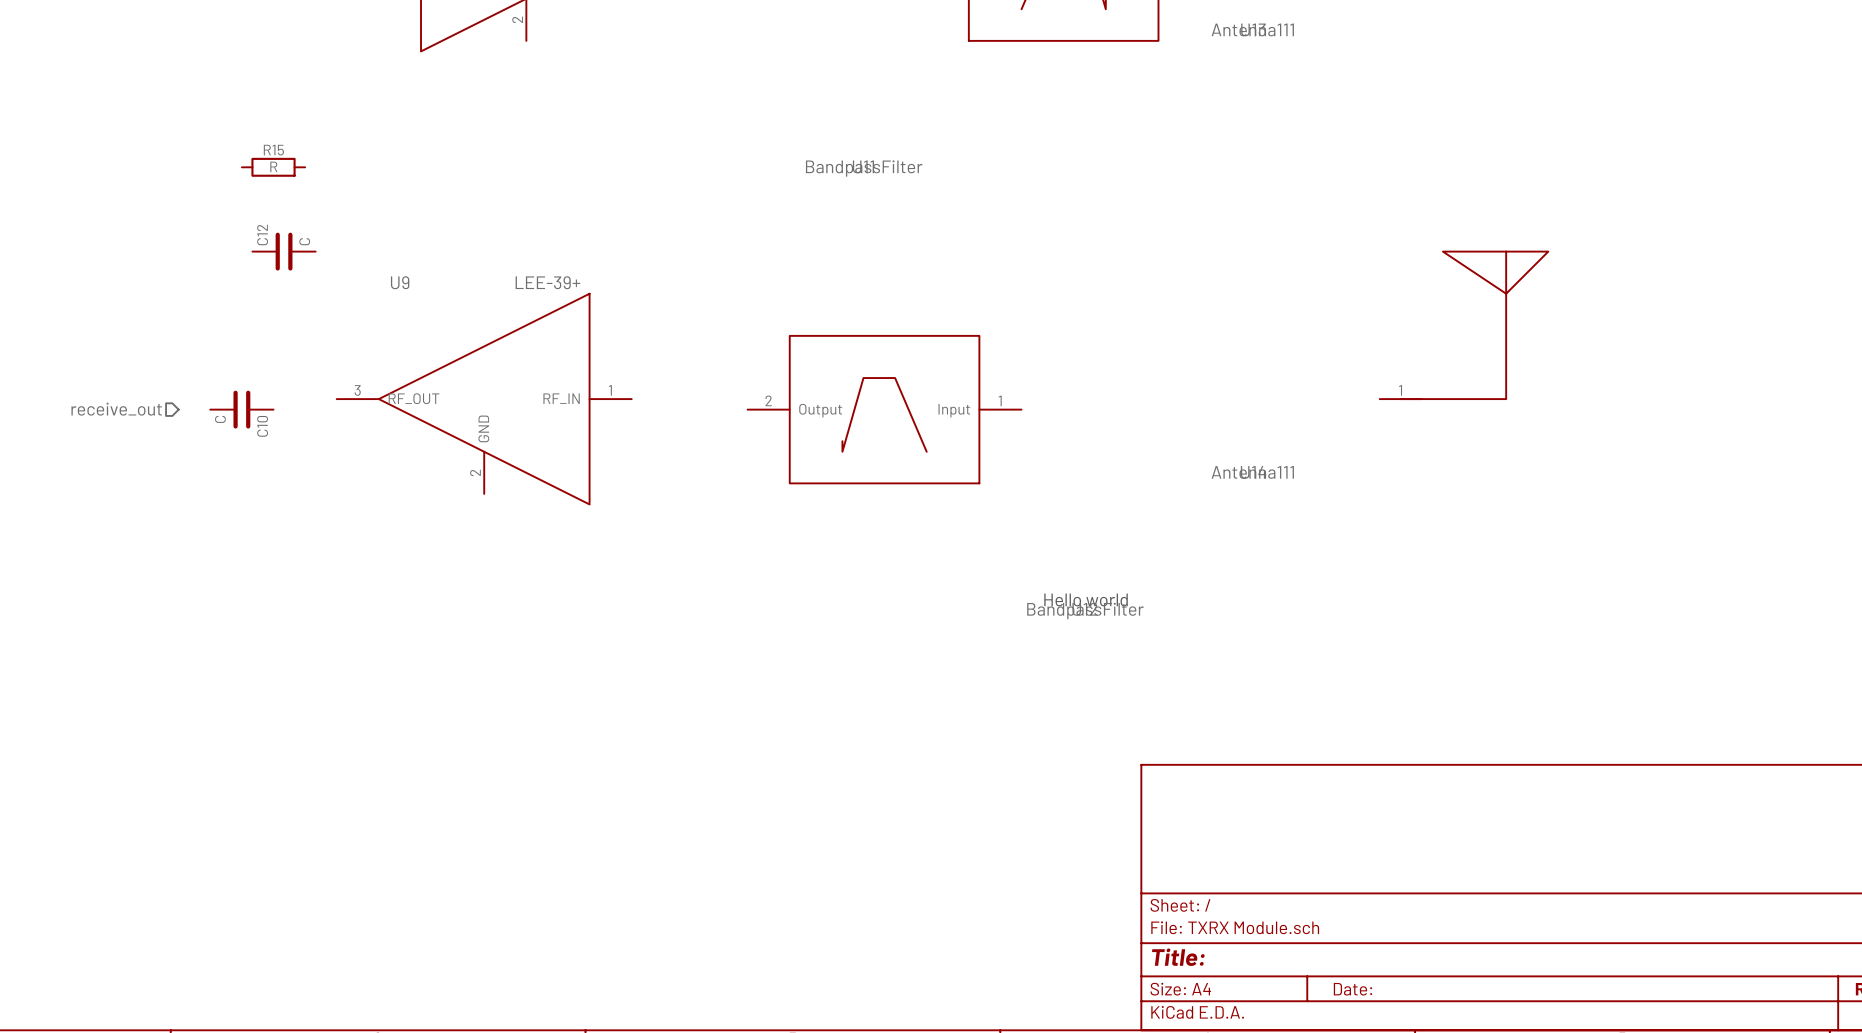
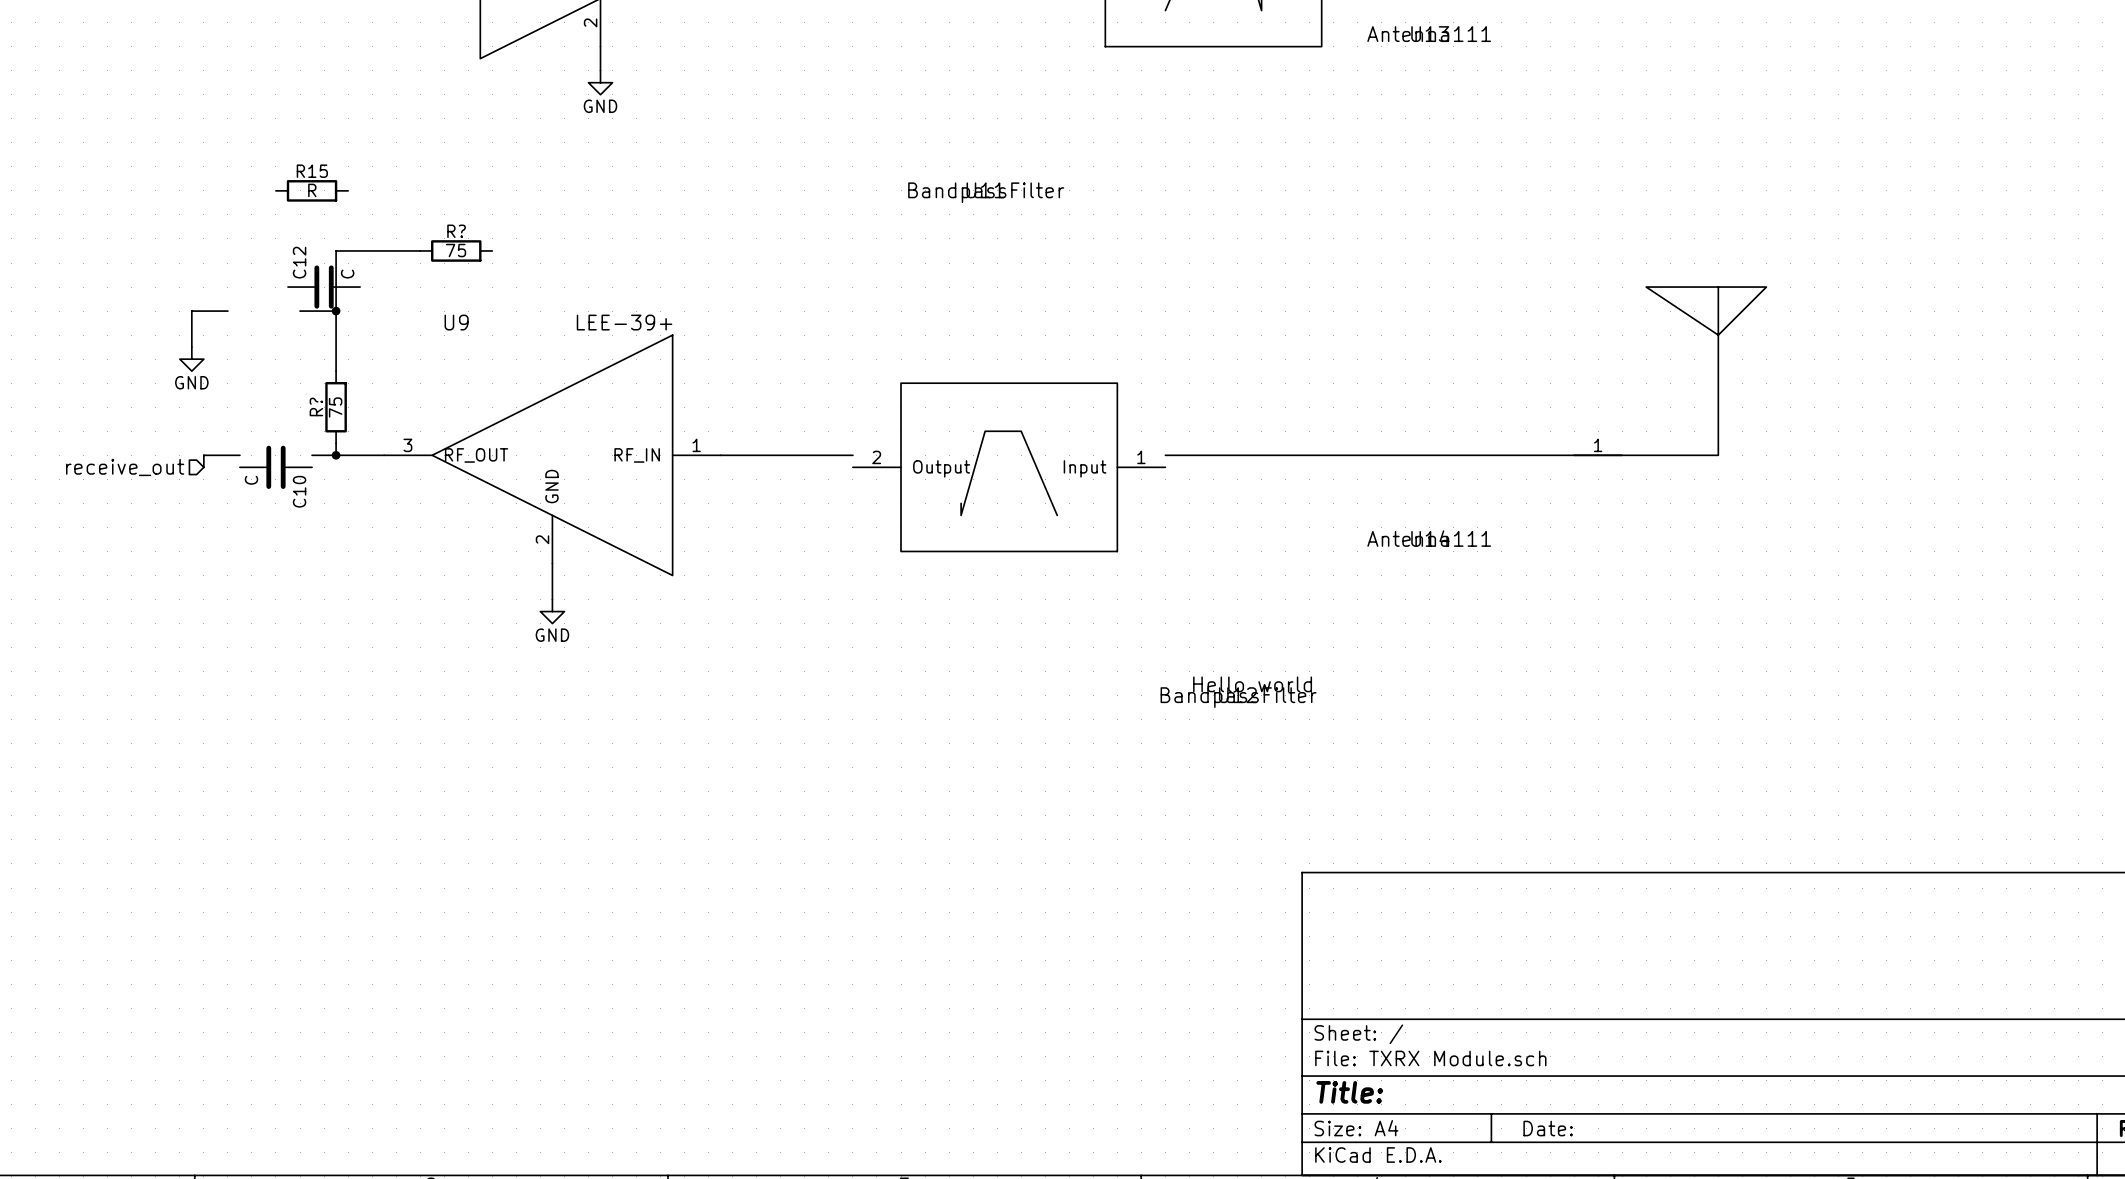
wire: none -> (600, 46) (600, 70)
power symbol: none -> GND (600, 82)
wire: none -> (420, 250) (336, 250) (336, 371)
R?: none -> 75 (456, 250)
wire: none -> (227, 311) (191, 311) (191, 347)
wire: none -> (300, 311) (336, 311)
junction: none -> (336, 311)
power symbol: none -> GND (191, 359)
R?: none -> 75 (336, 407)
wire: none -> (336, 443) (336, 455)
wire: none -> (239, 455) (203, 455) (203, 467)
wire: none -> (312, 455) (384, 455)
junction: none -> (336, 455)
wire: none -> (720, 455) (852, 455)
wire: none -> (1165, 455) (1598, 455)
wire: none -> (552, 563) (552, 599)
power symbol: none -> GND (552, 611)

